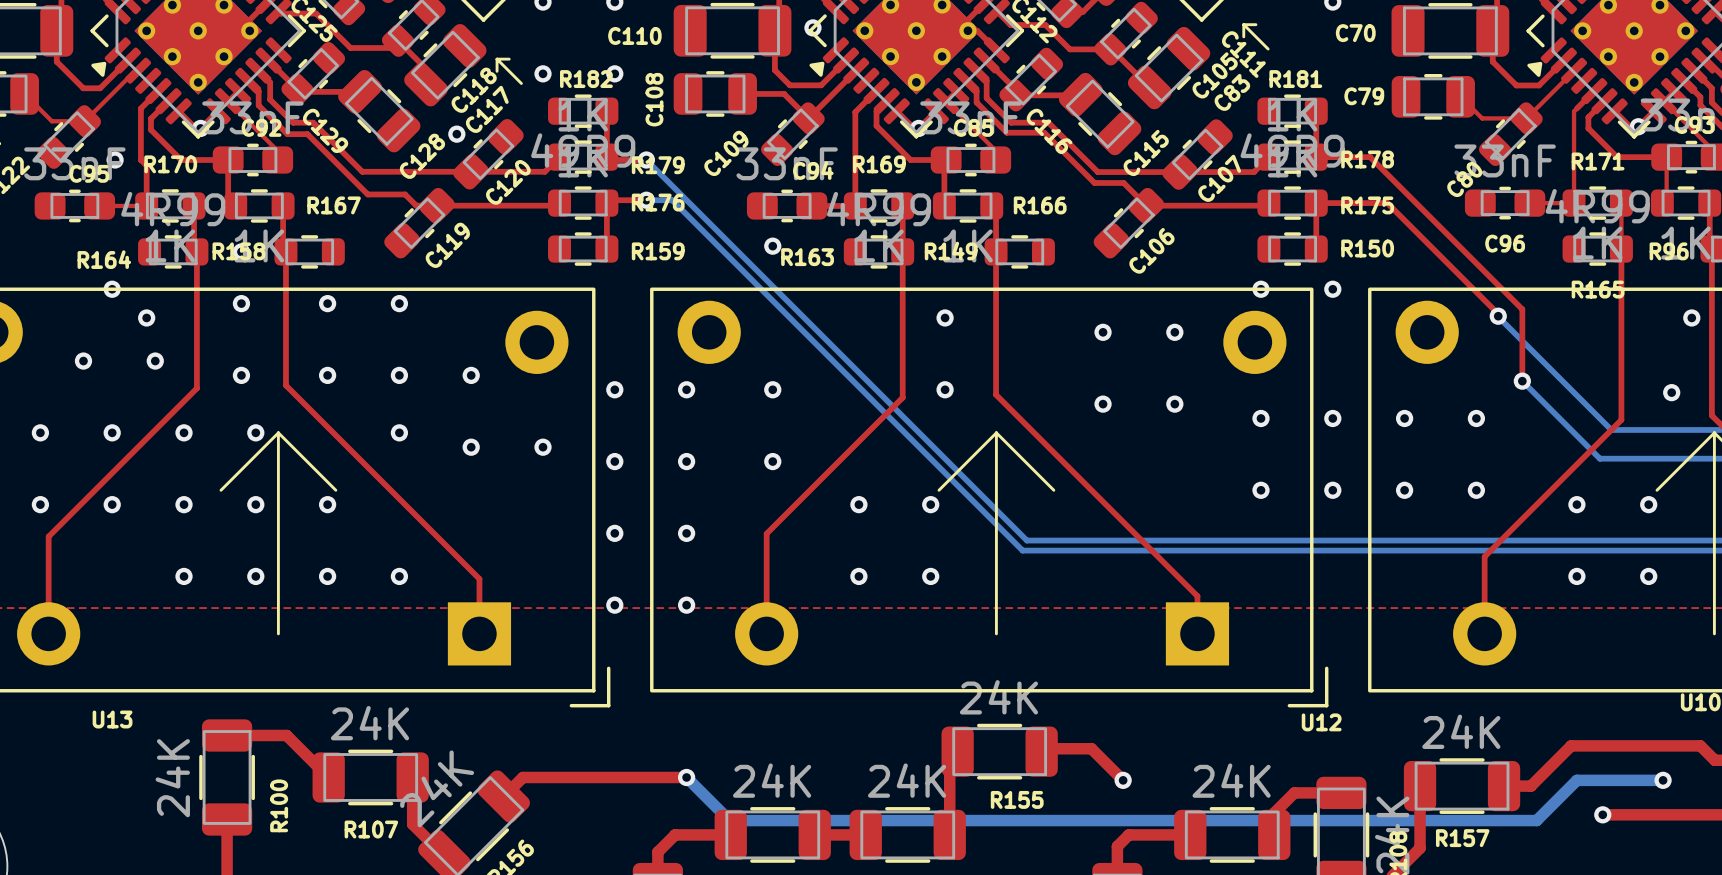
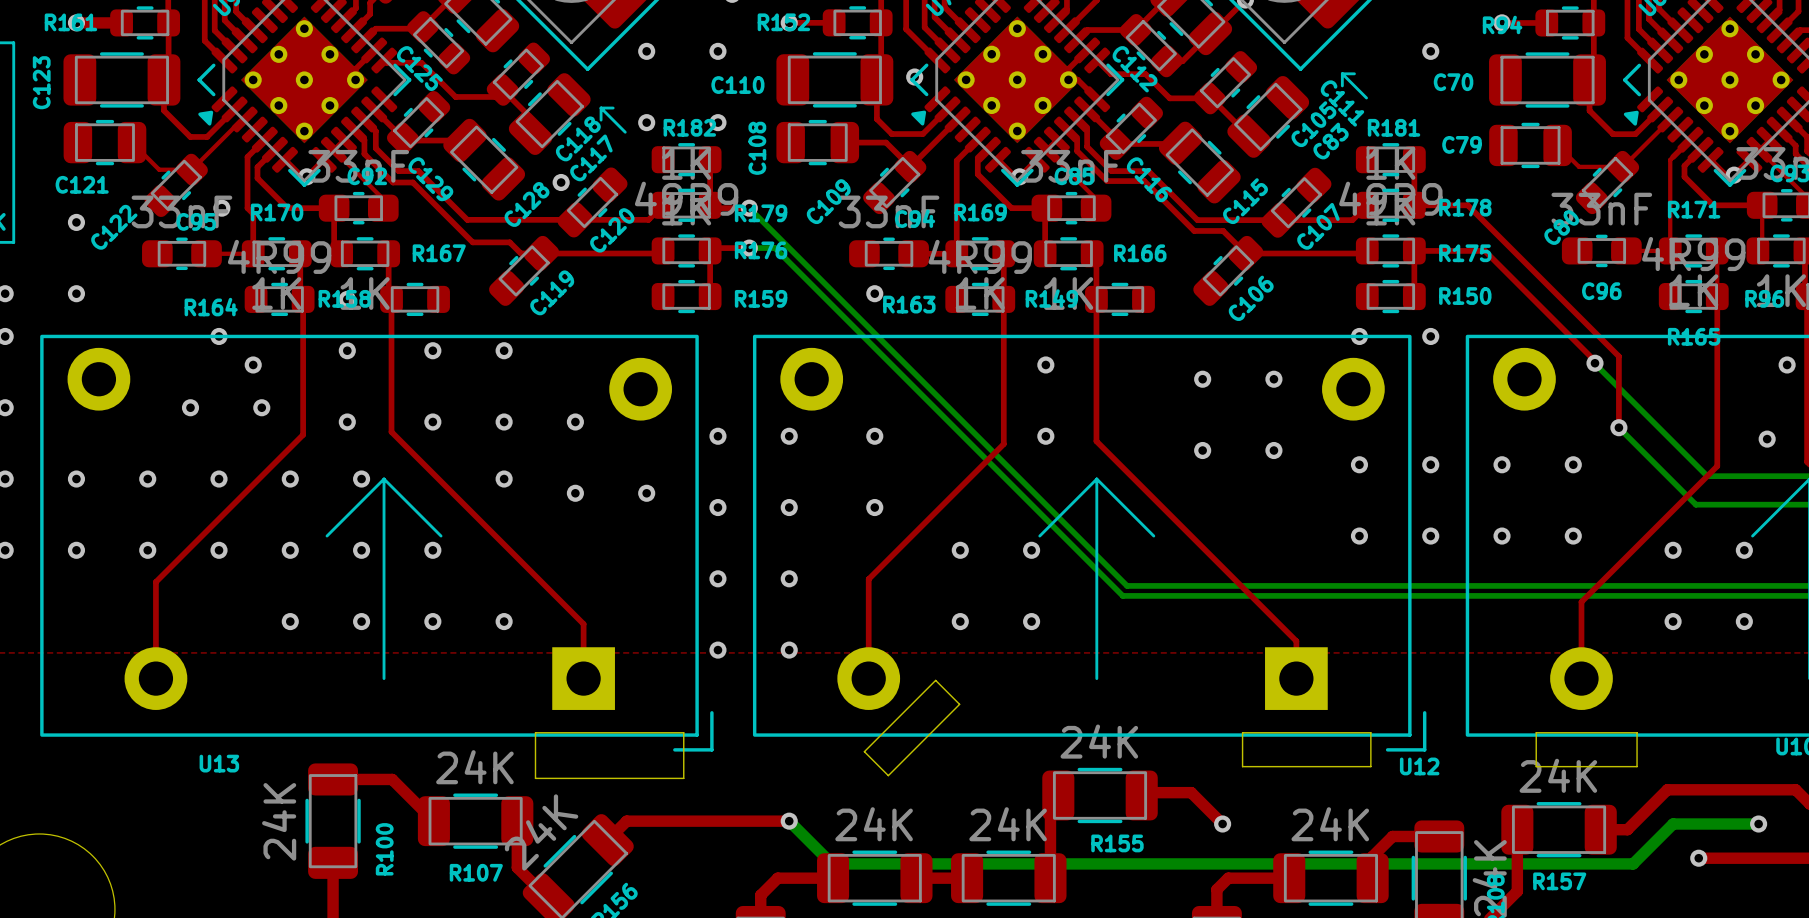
board edge: none -> (935, 680) (864, 751) (888, 775) (959, 704) (935, 680)
board edge: none -> (535, 732) (683, 732) (683, 778) (535, 778) (535, 732)
board edge: none -> (1242, 732) (1370, 732) (1370, 766) (1242, 766) (1242, 732)
board edge: none -> (1536, 732) (1637, 732) (1637, 766) (1536, 766) (1536, 732)

